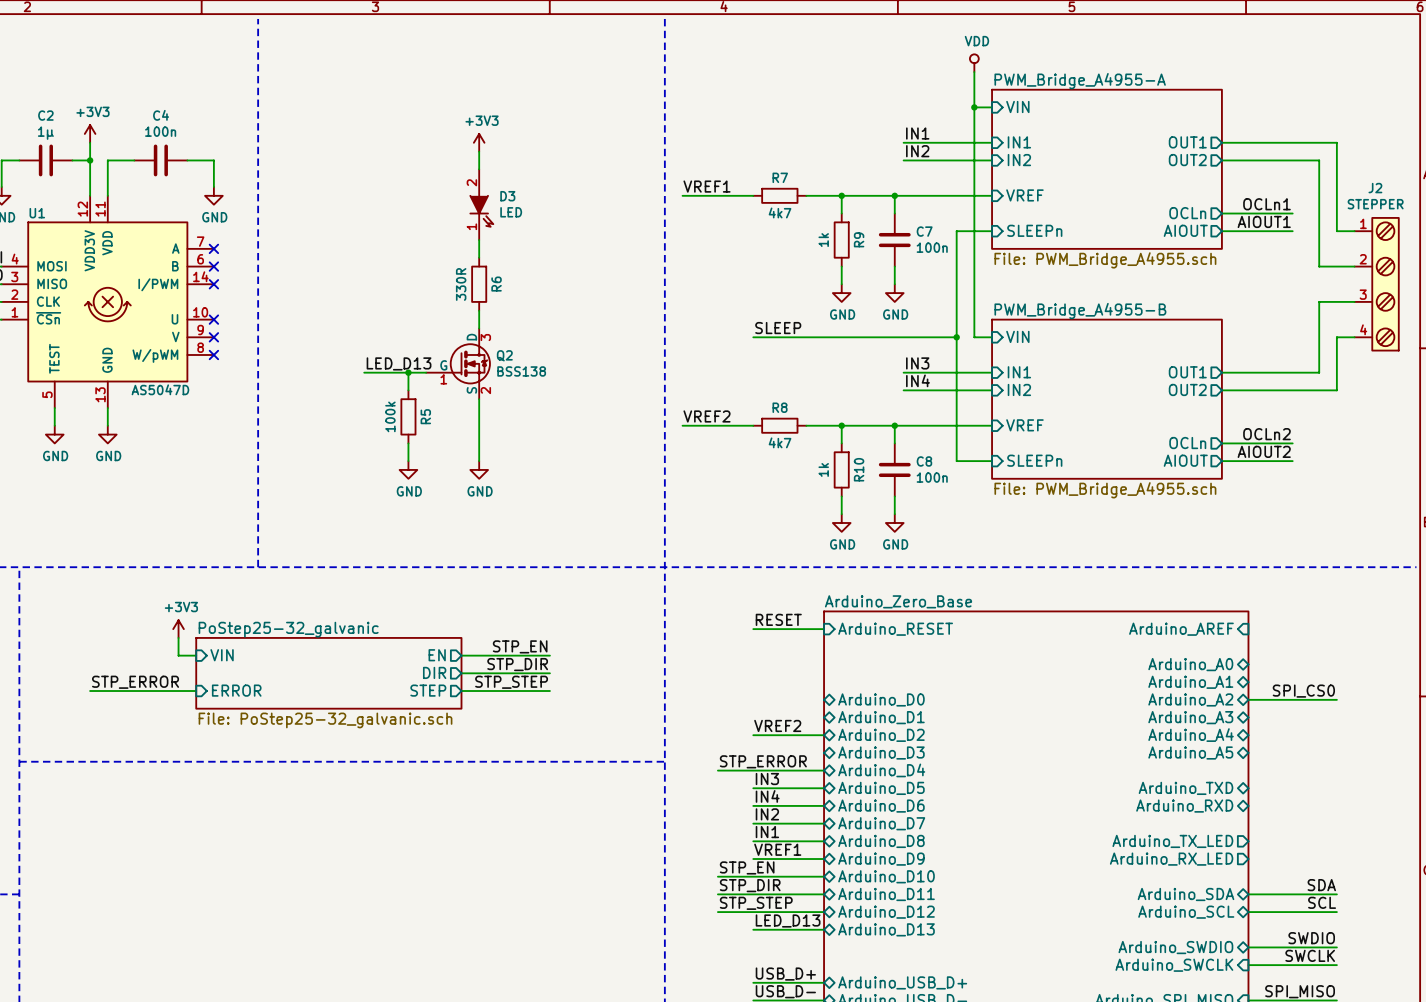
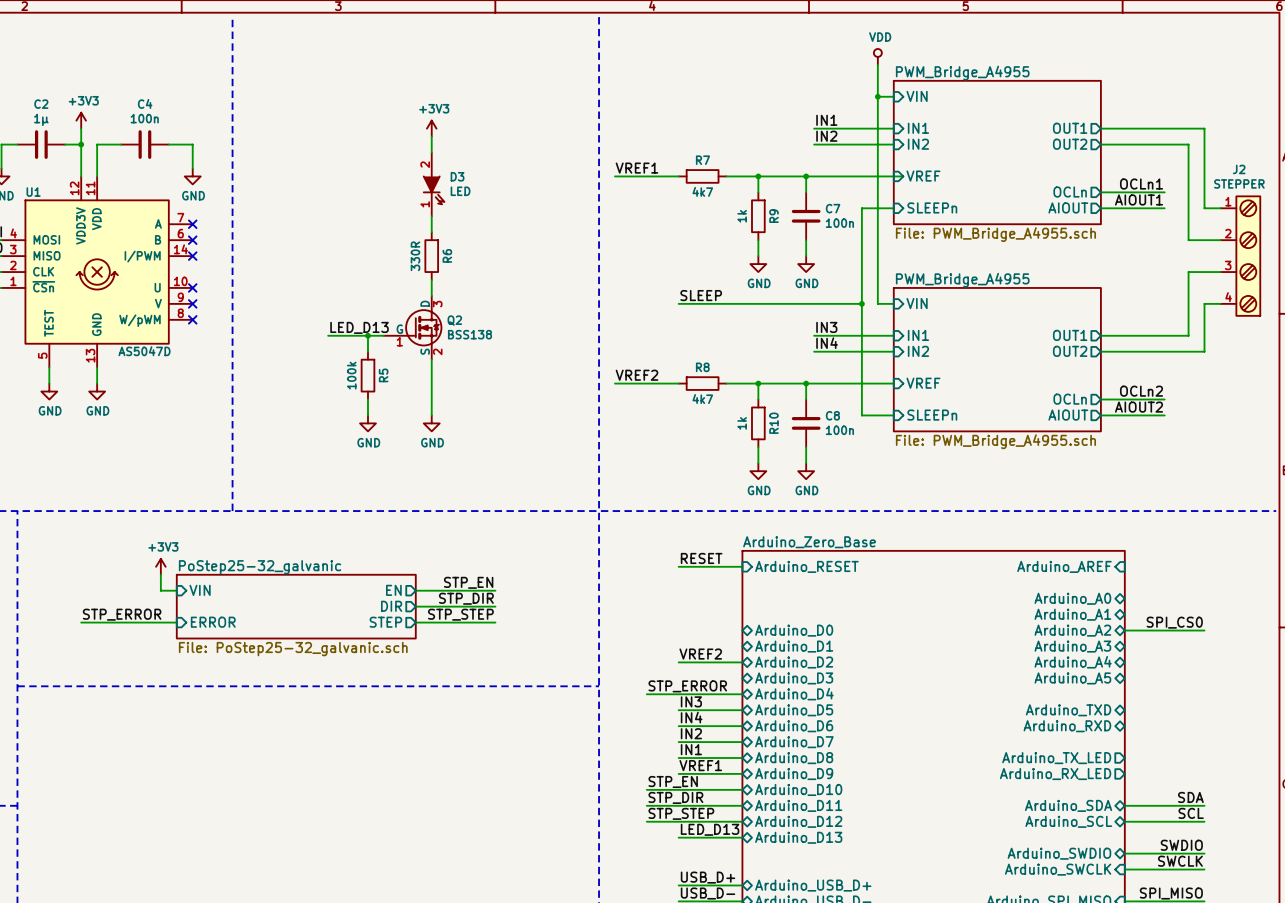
sheet PWM_Bridge_A4955-A name: PWM_Bridge_A4955-A (1080, 81) -> PWM_Bridge_A4955 (962, 73)
wire: none -> (893, 176) (901, 176)
sheet PWM_Bridge_A4955-B name: PWM_Bridge_A4955-B (1080, 311) -> PWM_Bridge_A4955 (962, 280)

